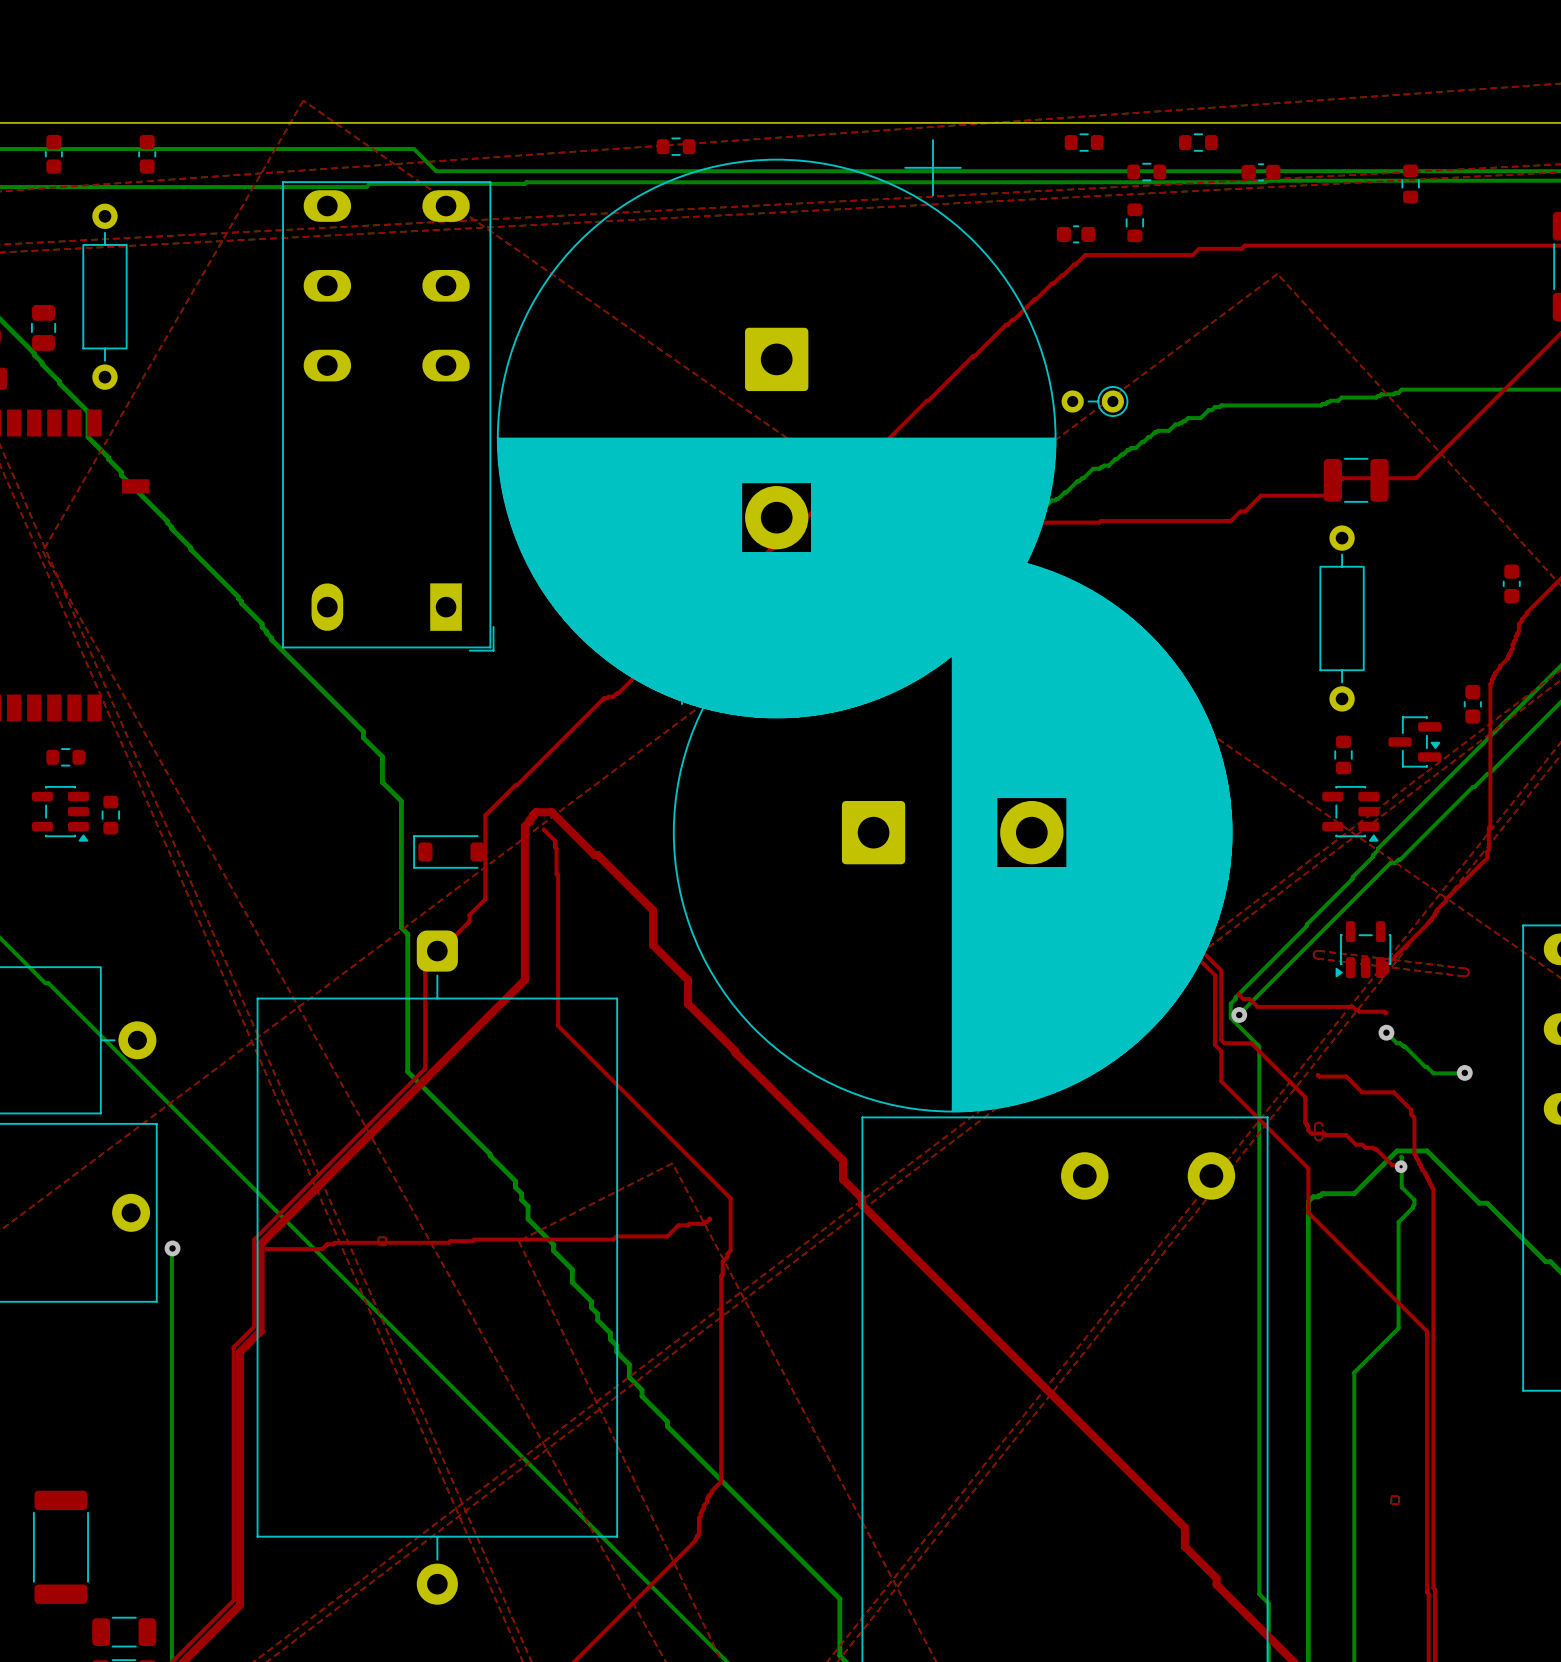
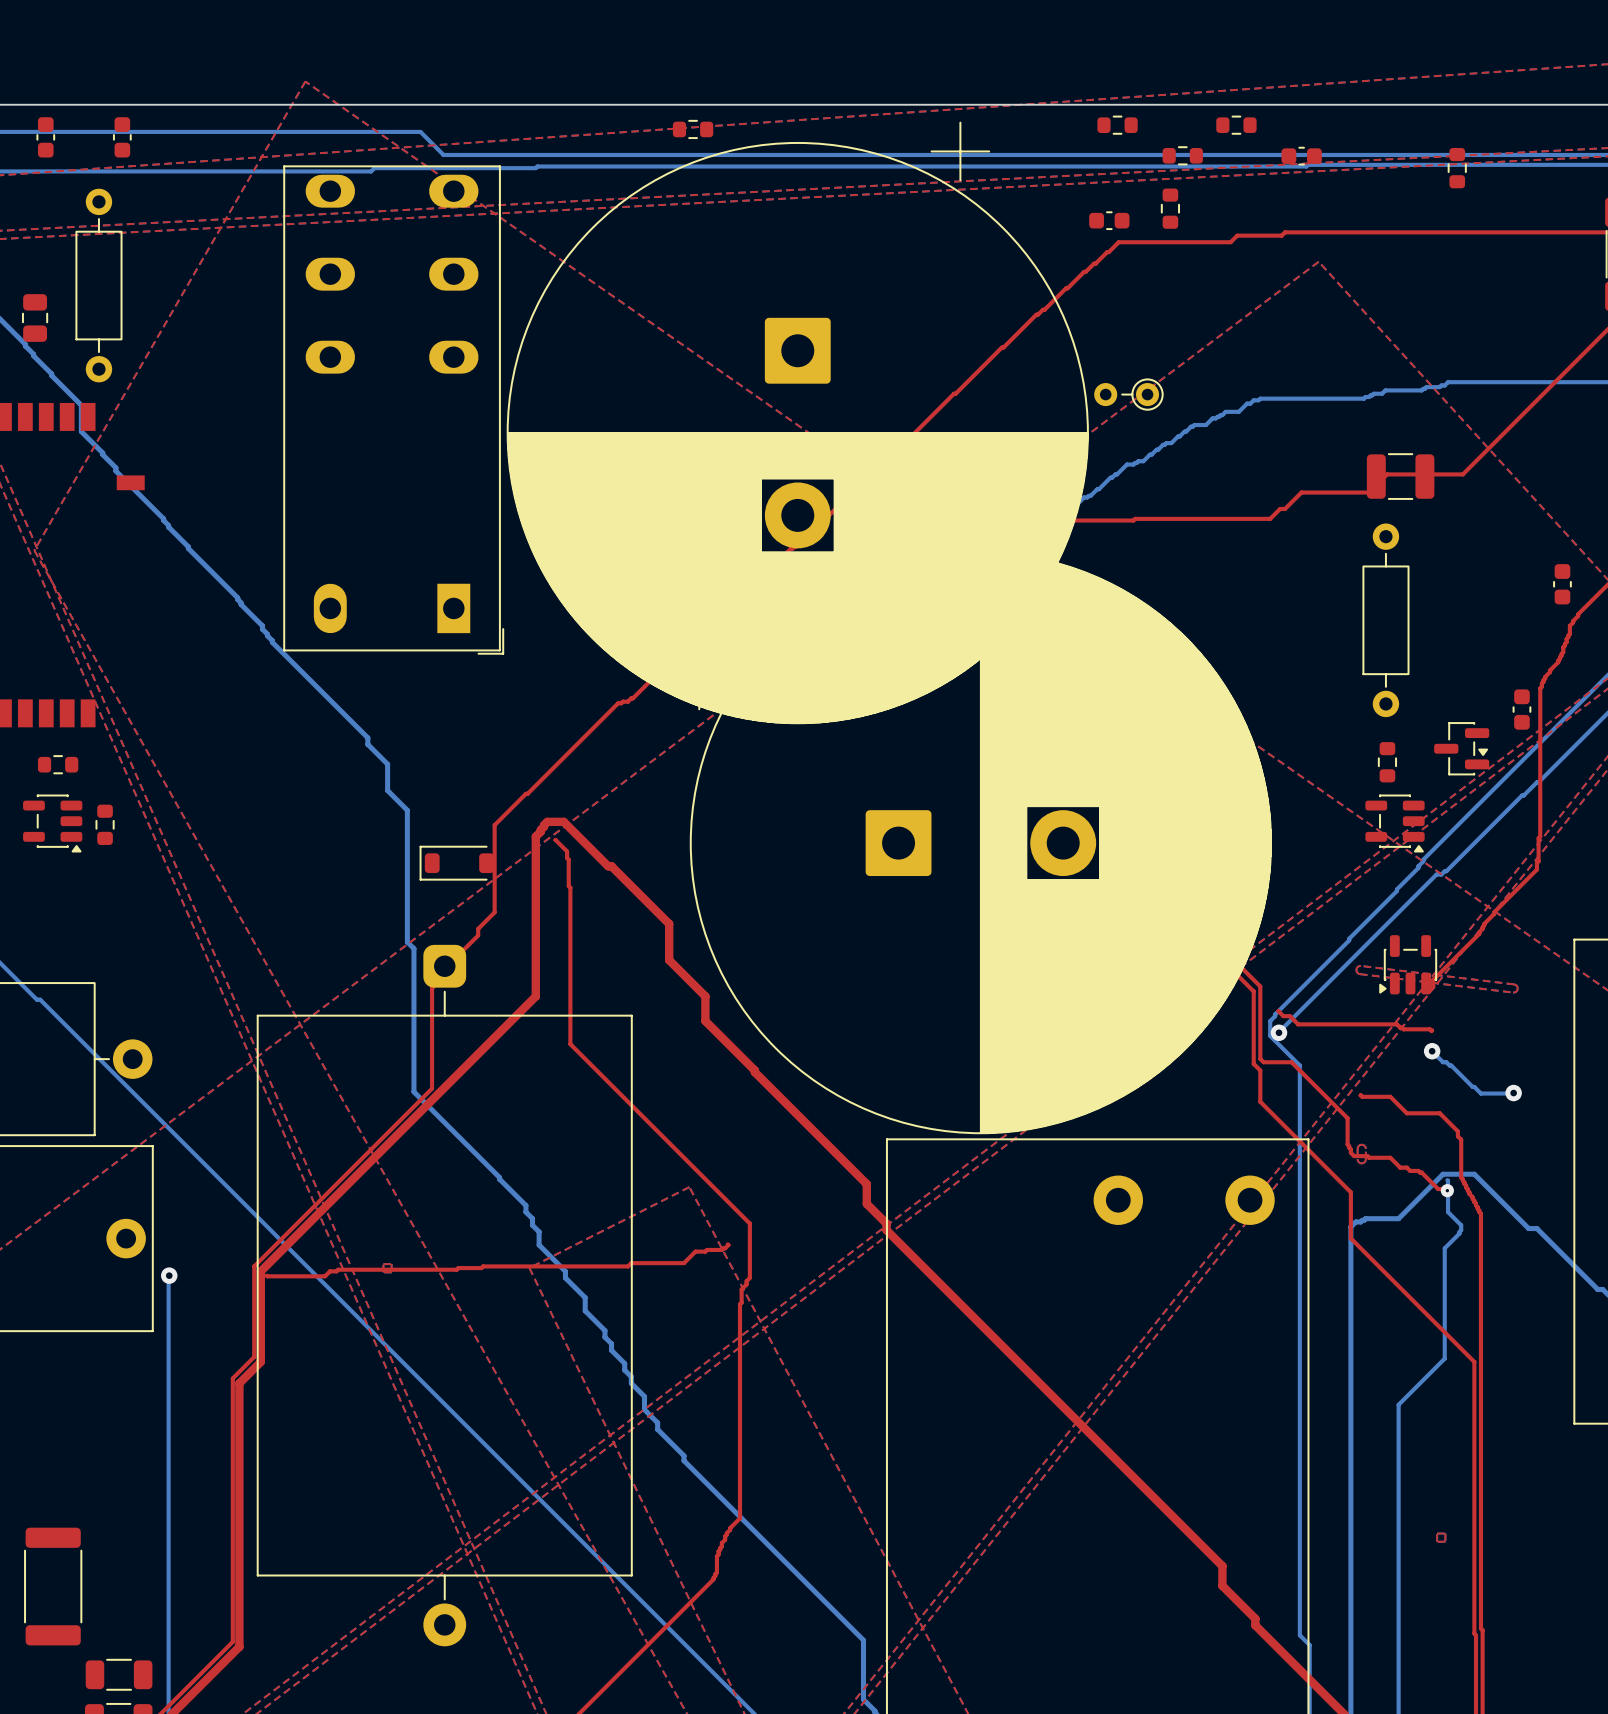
part position: (147, 154) -> (122, 137)

